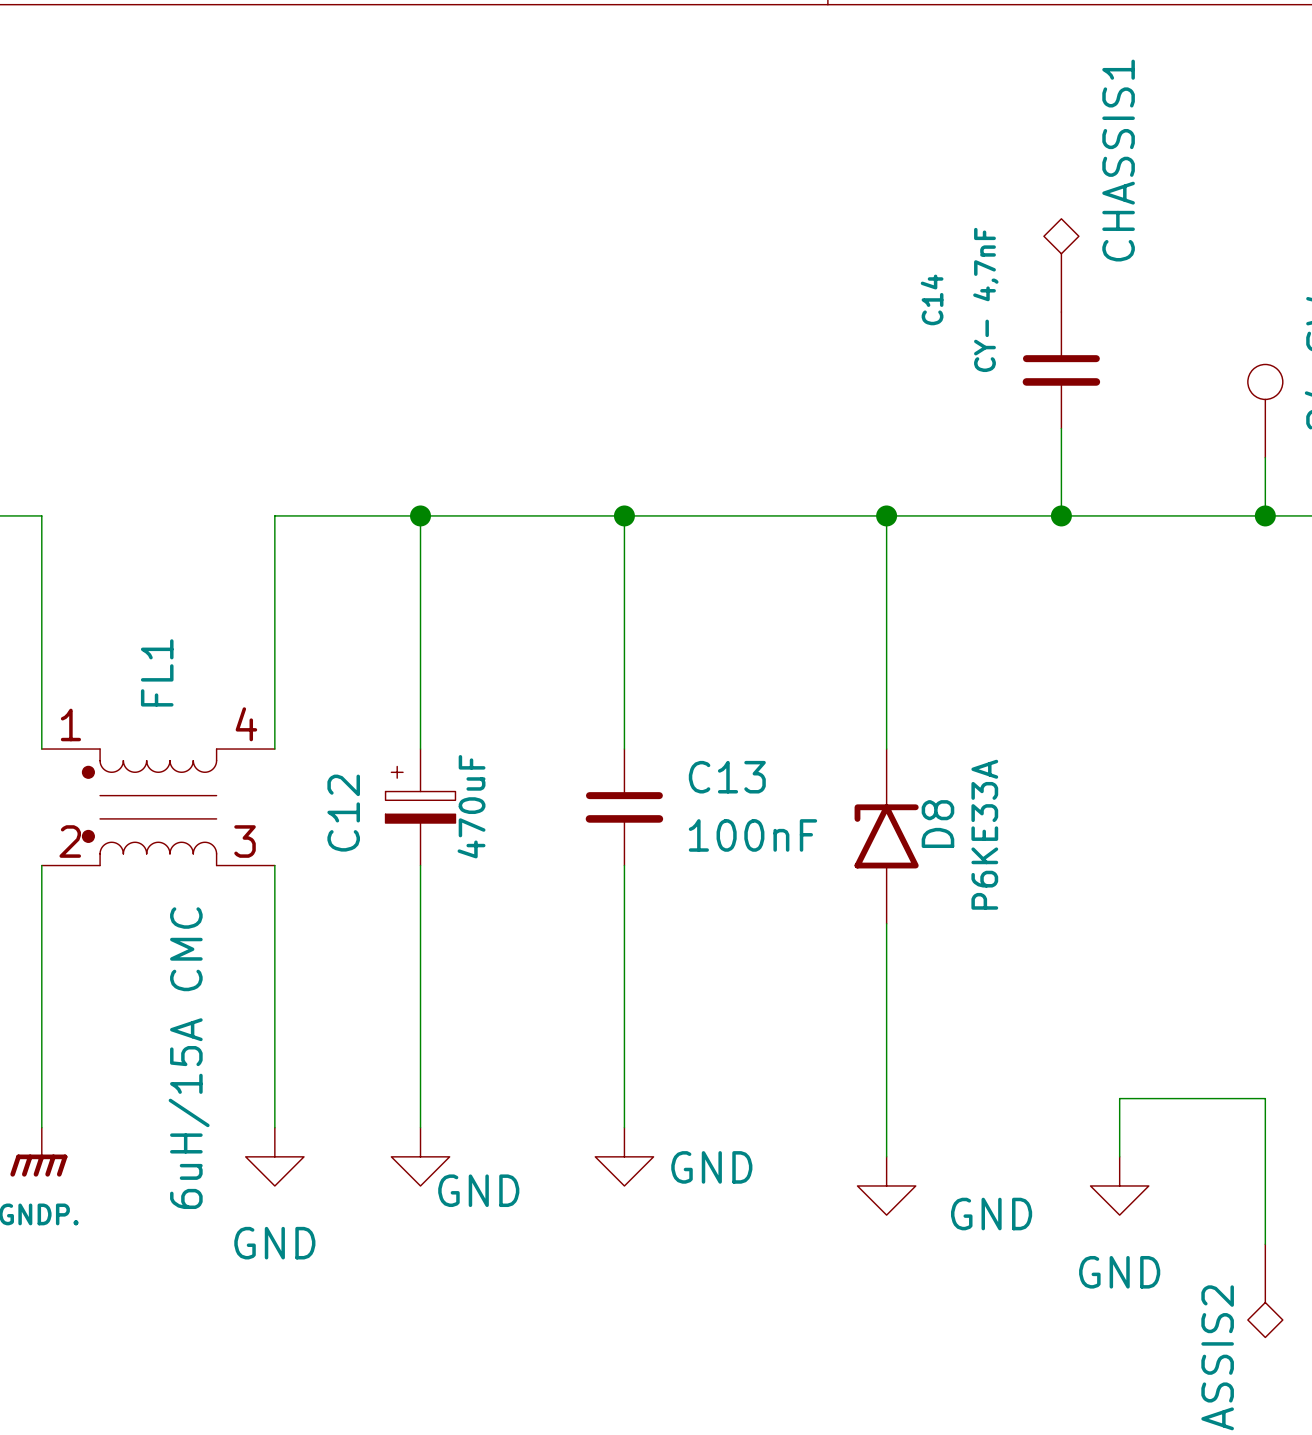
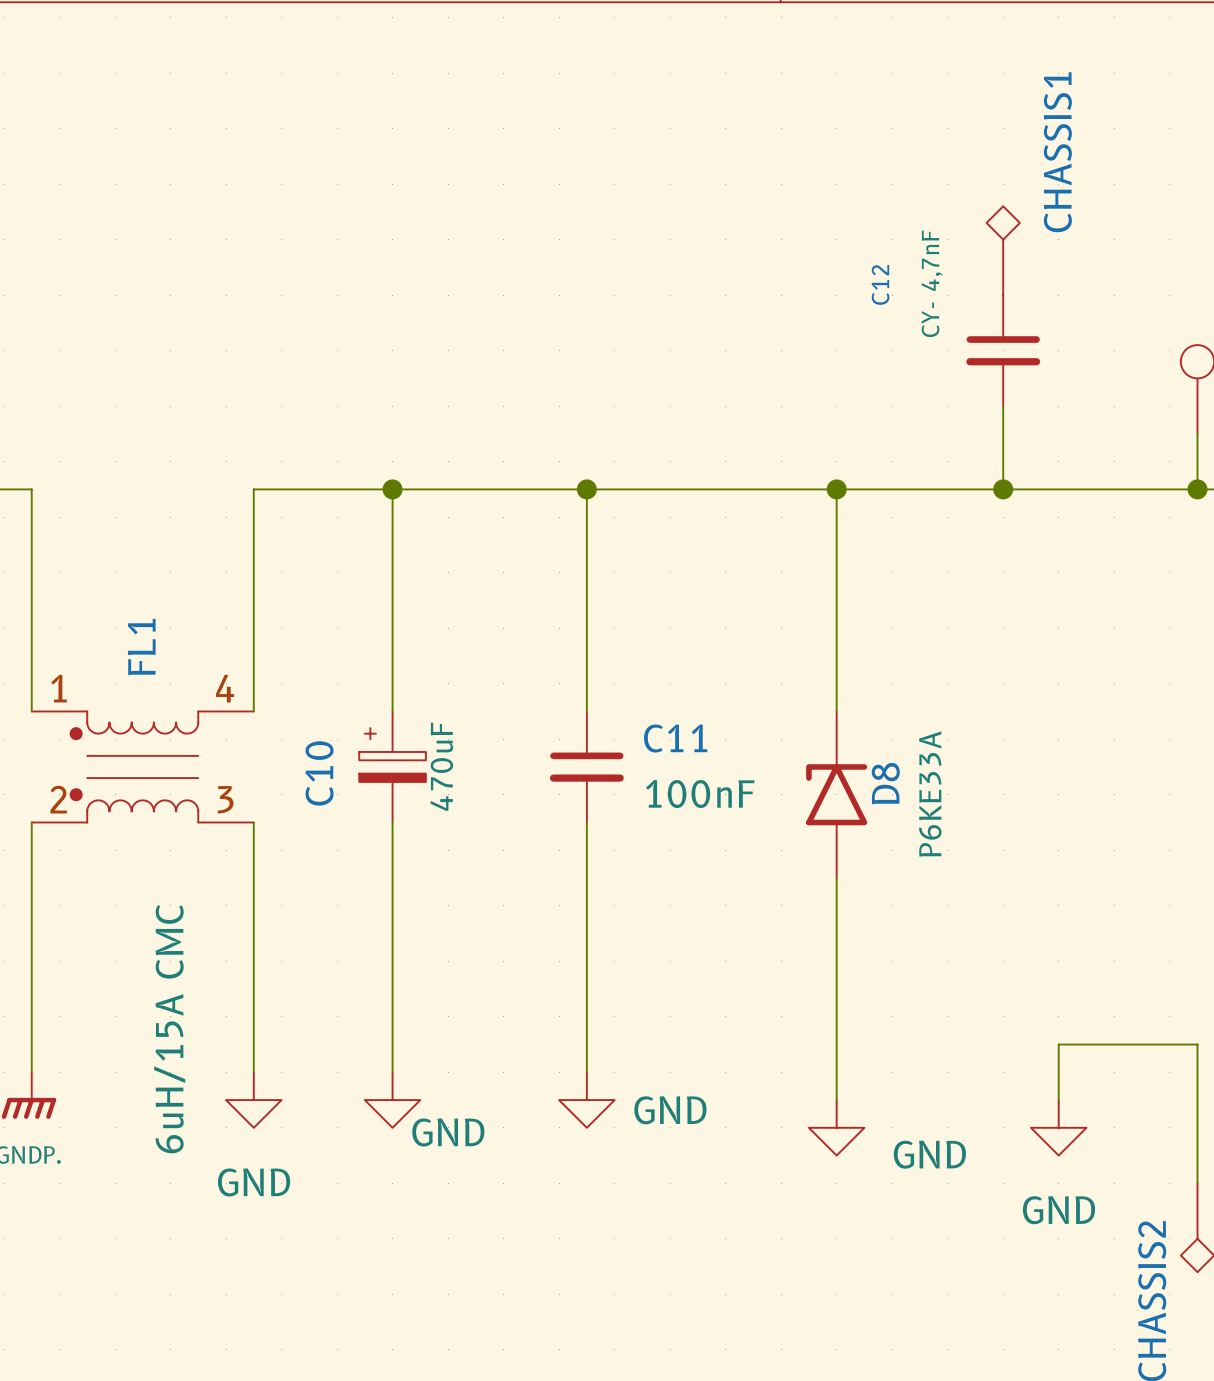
C14 name: C14 (932, 299) -> C12 (880, 284)
C13 name: C13 (727, 777) -> C11 (675, 738)
C12 name: C12 (343, 813) -> C10 (319, 773)

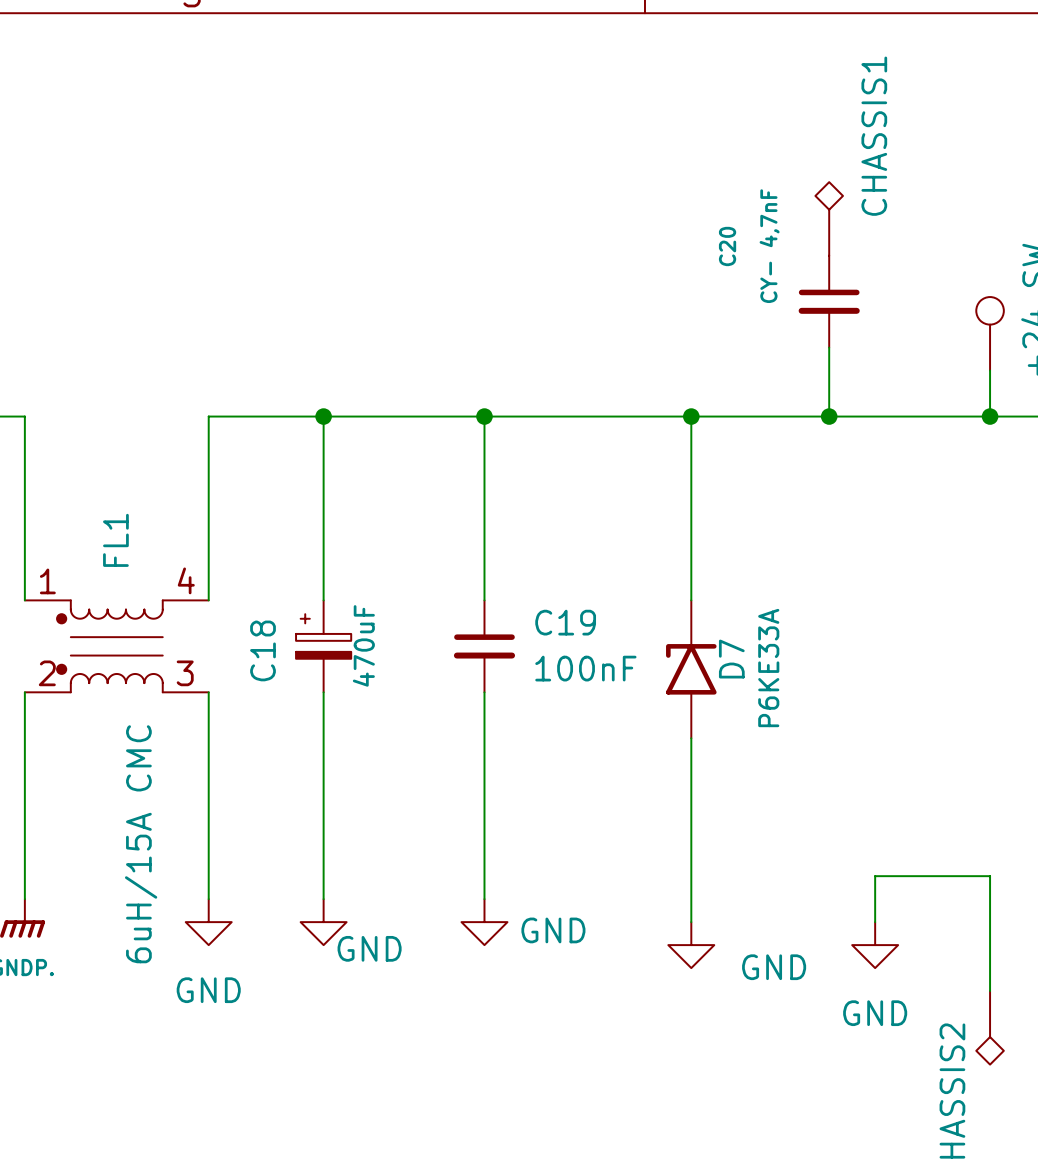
C12 name: C12 (880, 284) -> C20 (727, 246)
C11 name: C11 (675, 738) -> C19 (565, 622)
C10 name: C10 (319, 773) -> C18 (263, 650)
D8 name: D8 (885, 783) -> D7 (731, 659)

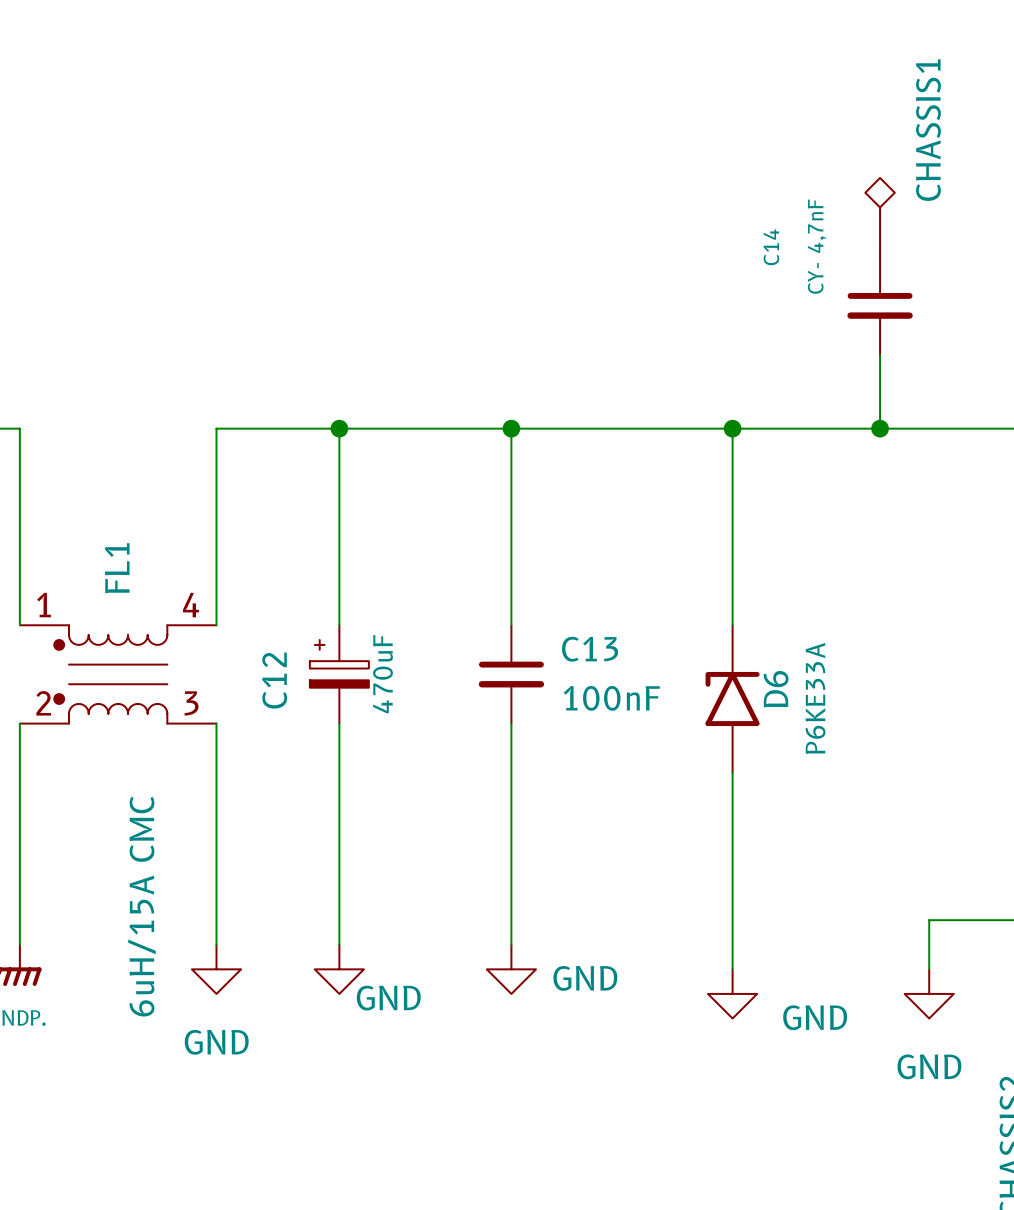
C20 name: C20 (727, 246) -> C14 (771, 247)
C19 name: C19 (565, 622) -> C13 (590, 649)
C18 name: C18 (263, 650) -> C12 (274, 680)
D7 name: D7 (731, 659) -> D6 (776, 689)

